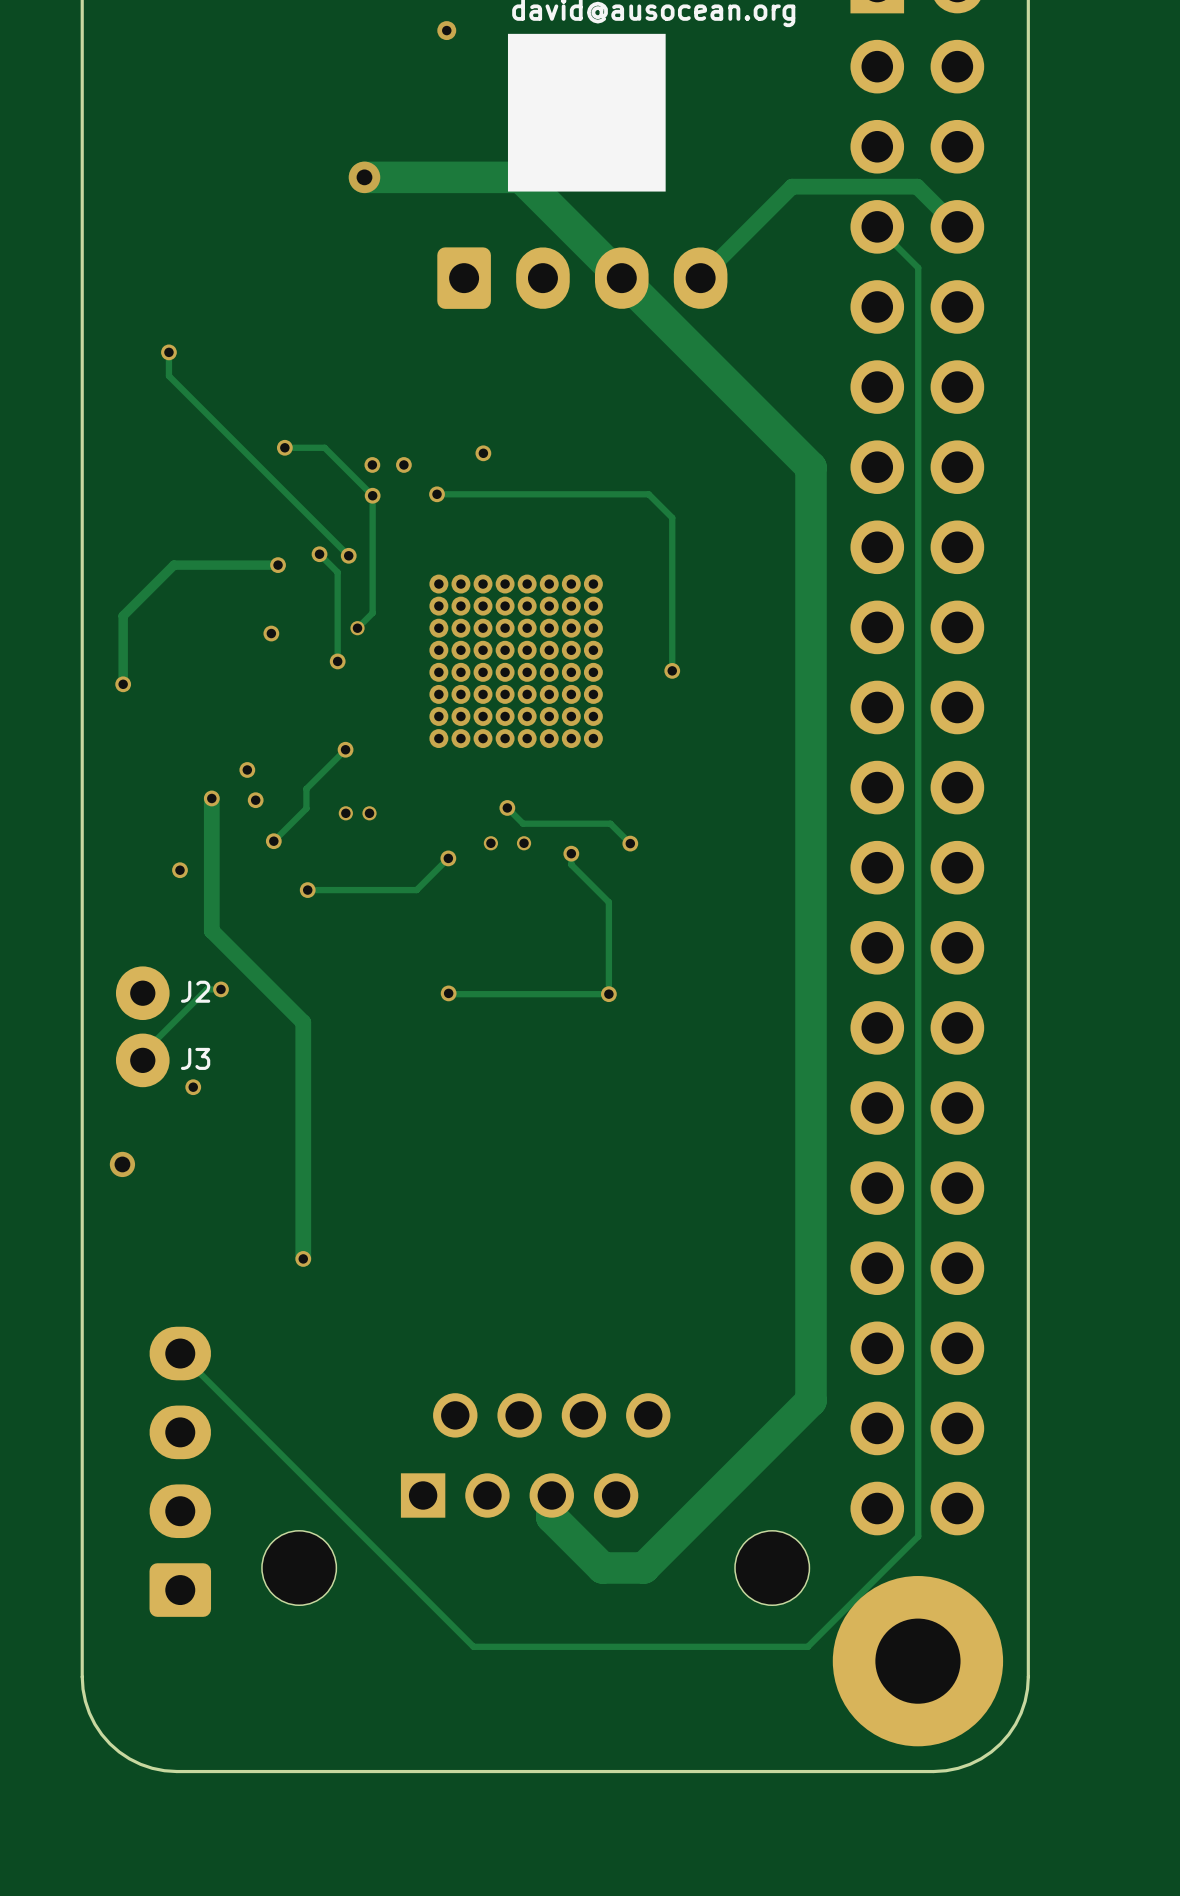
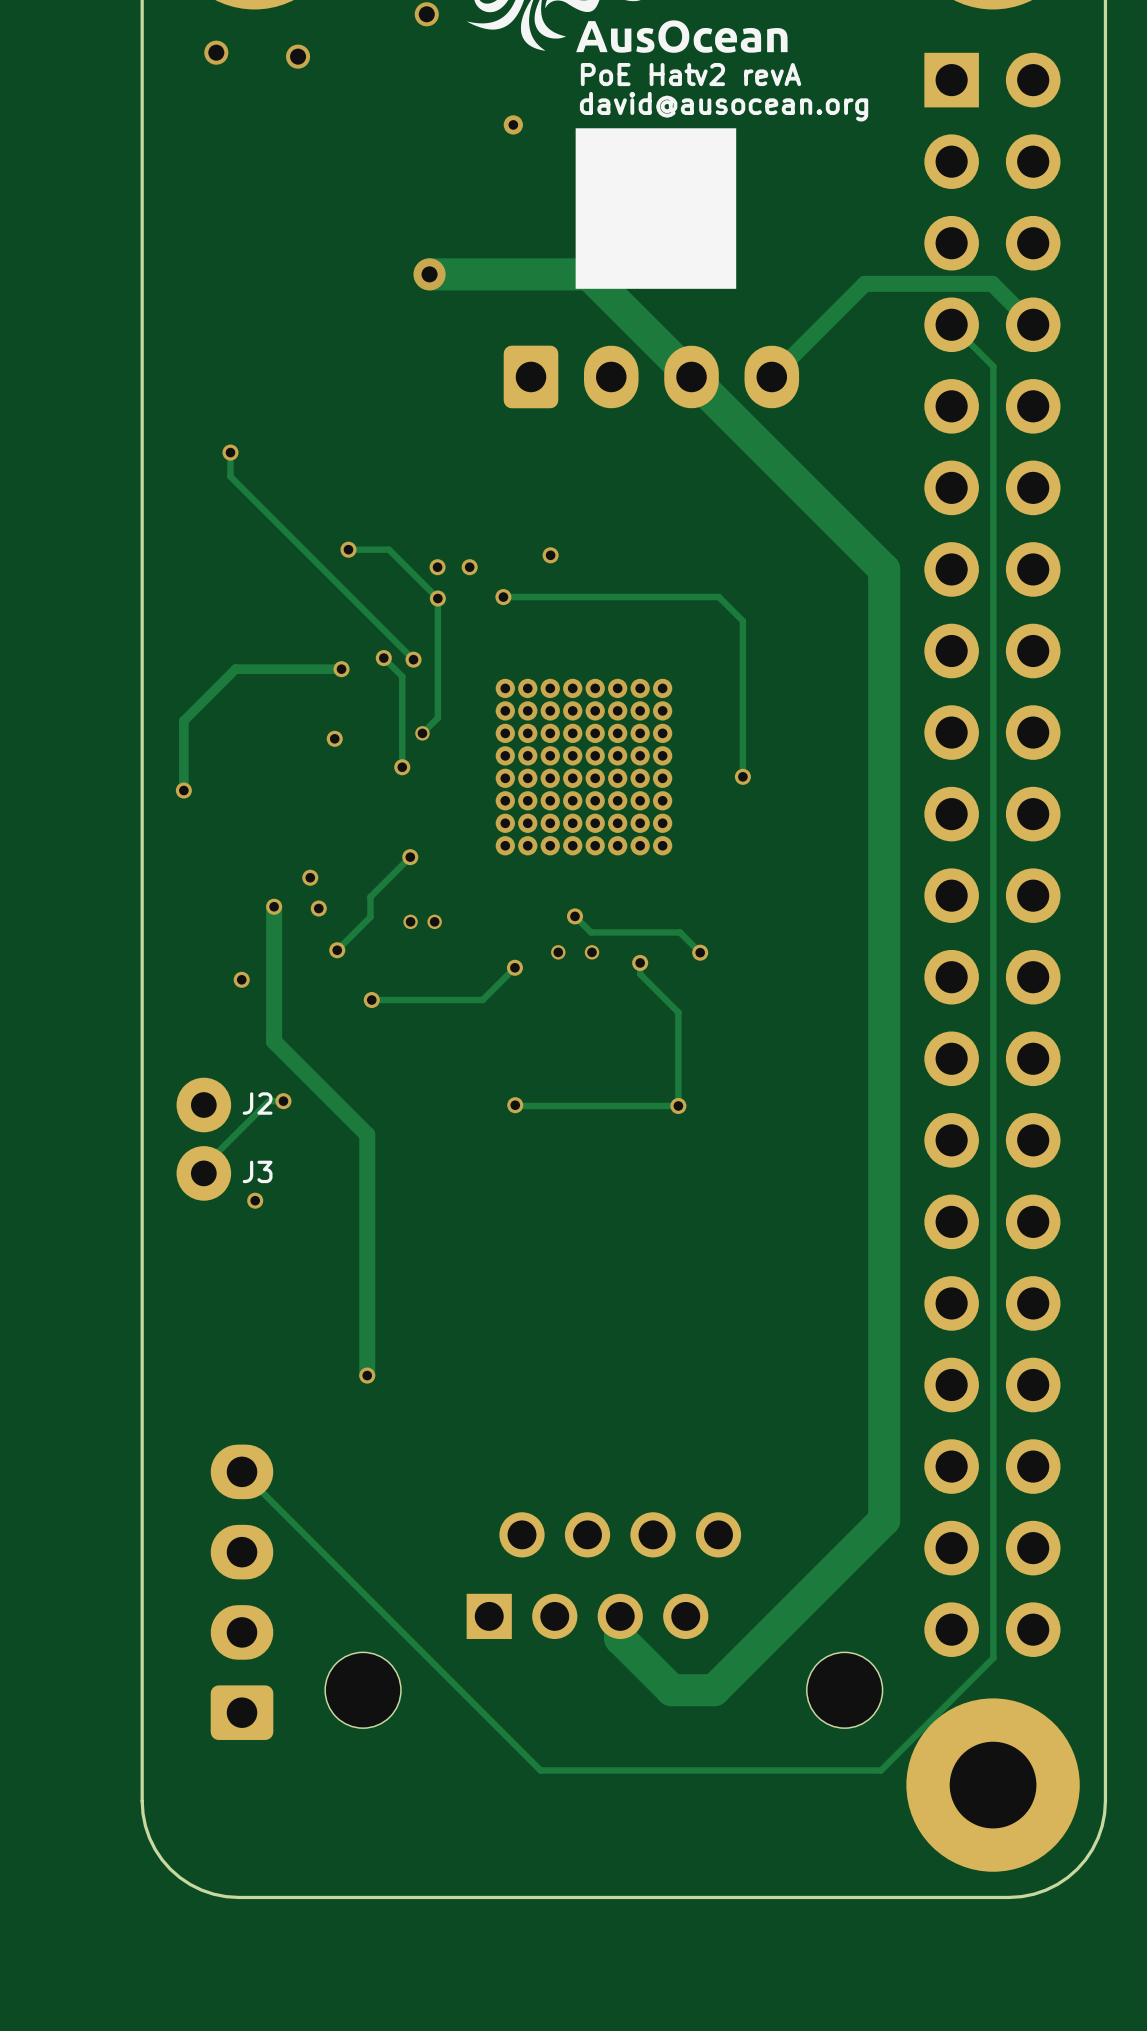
via: (122, 1164) -> none

